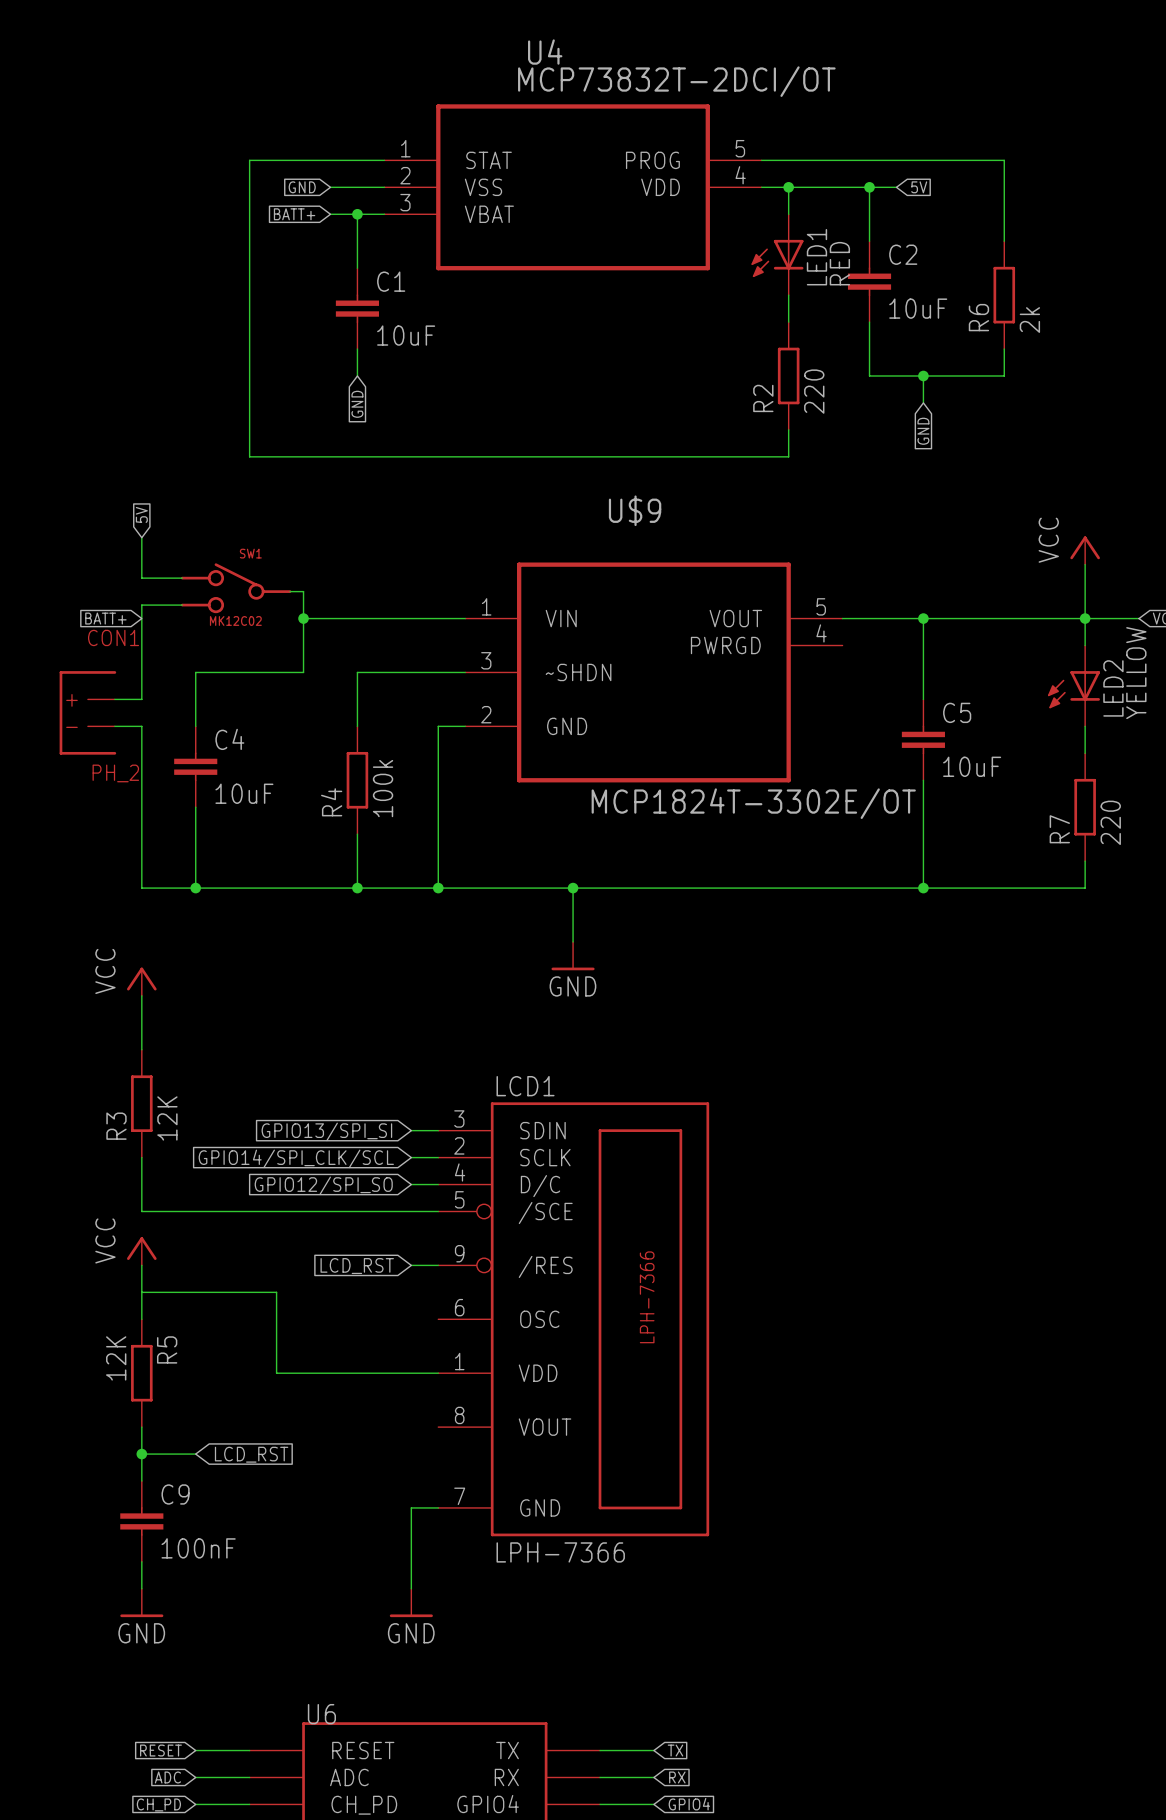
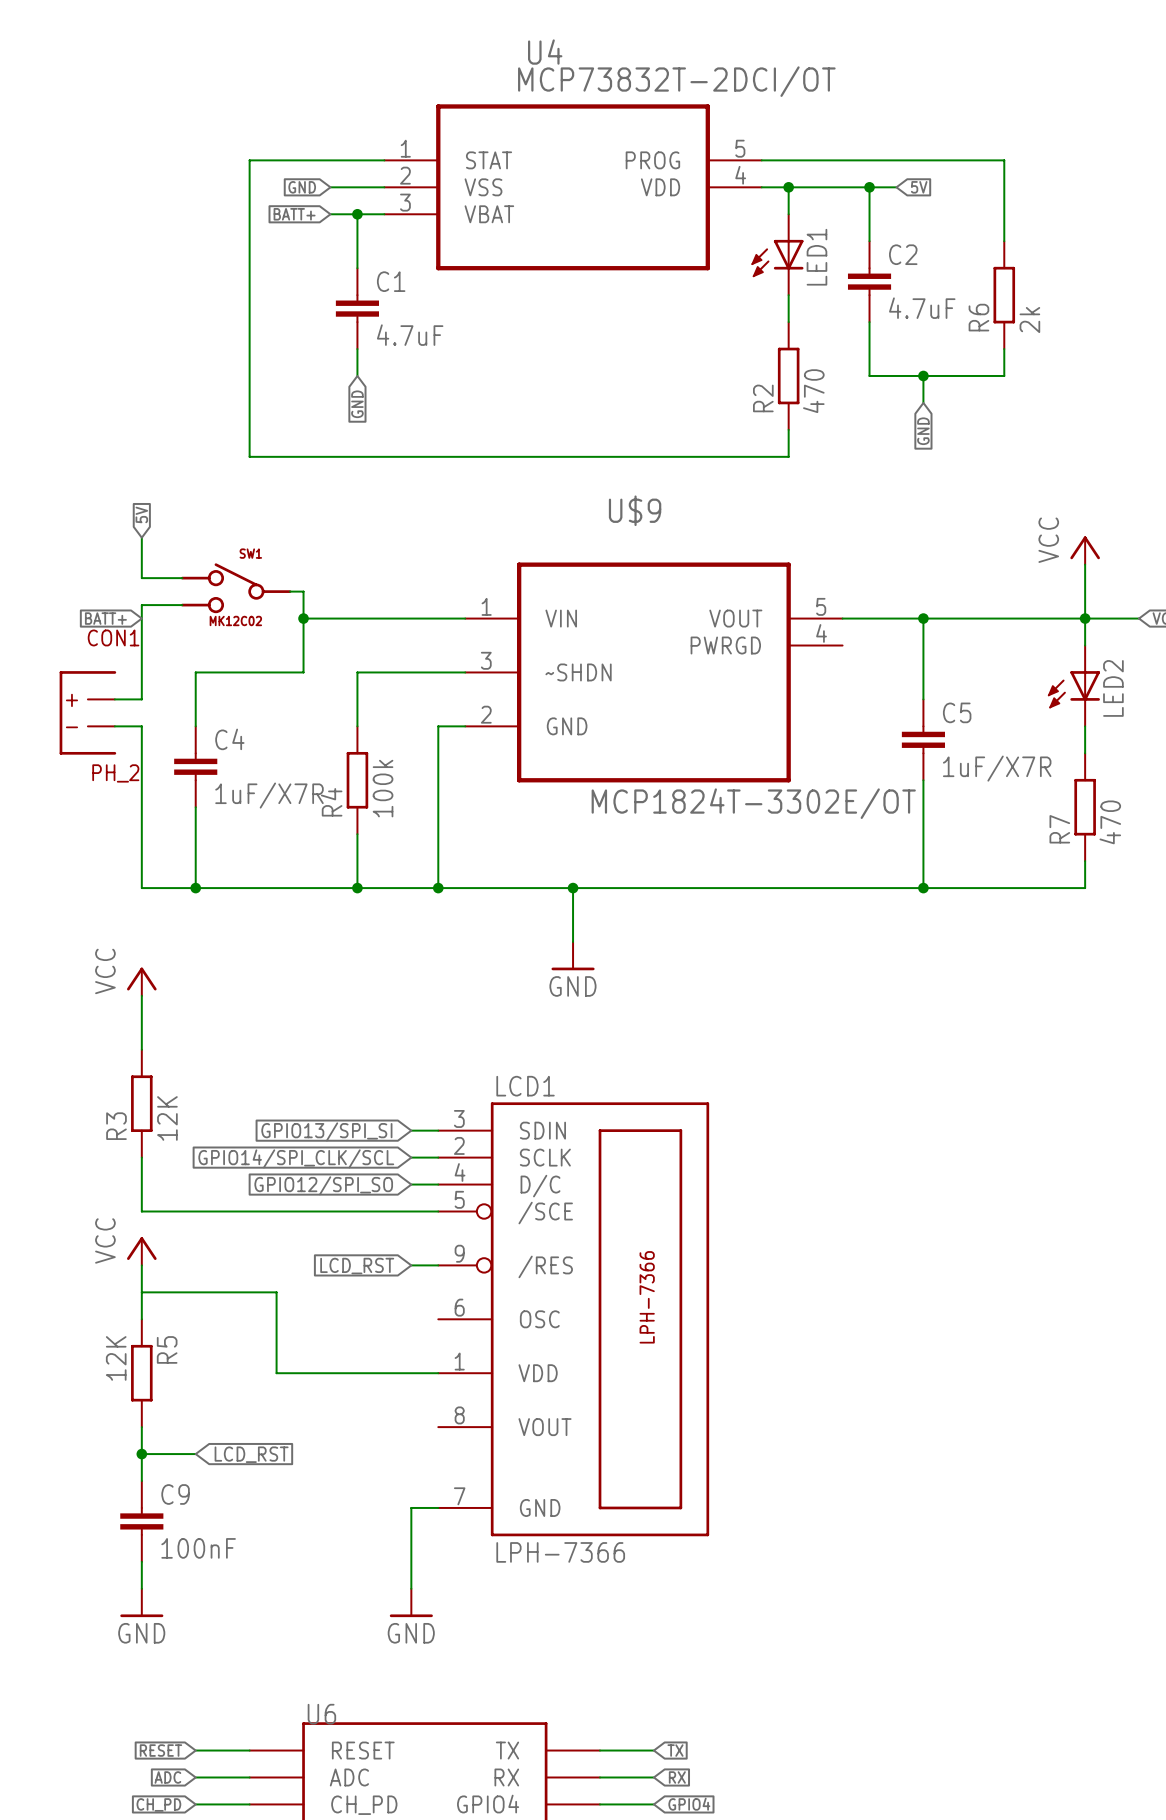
LED1 value: RED (839, 263) -> none
C2 value: 10uF (918, 308) -> 4.7uF (922, 308)
C1 value: 10uF (406, 335) -> 4.7uF (410, 335)
R2 value: 220 (814, 391) -> 470 (813, 391)
LED2 value: YELLOW (1136, 673) -> none
C5 value: 10uF (972, 766) -> 1uF/X7R (997, 768)
C4 value: 10uF (244, 793) -> 1uF/X7R (269, 795)
R7 value: 220 (1110, 822) -> 470 (1110, 822)

